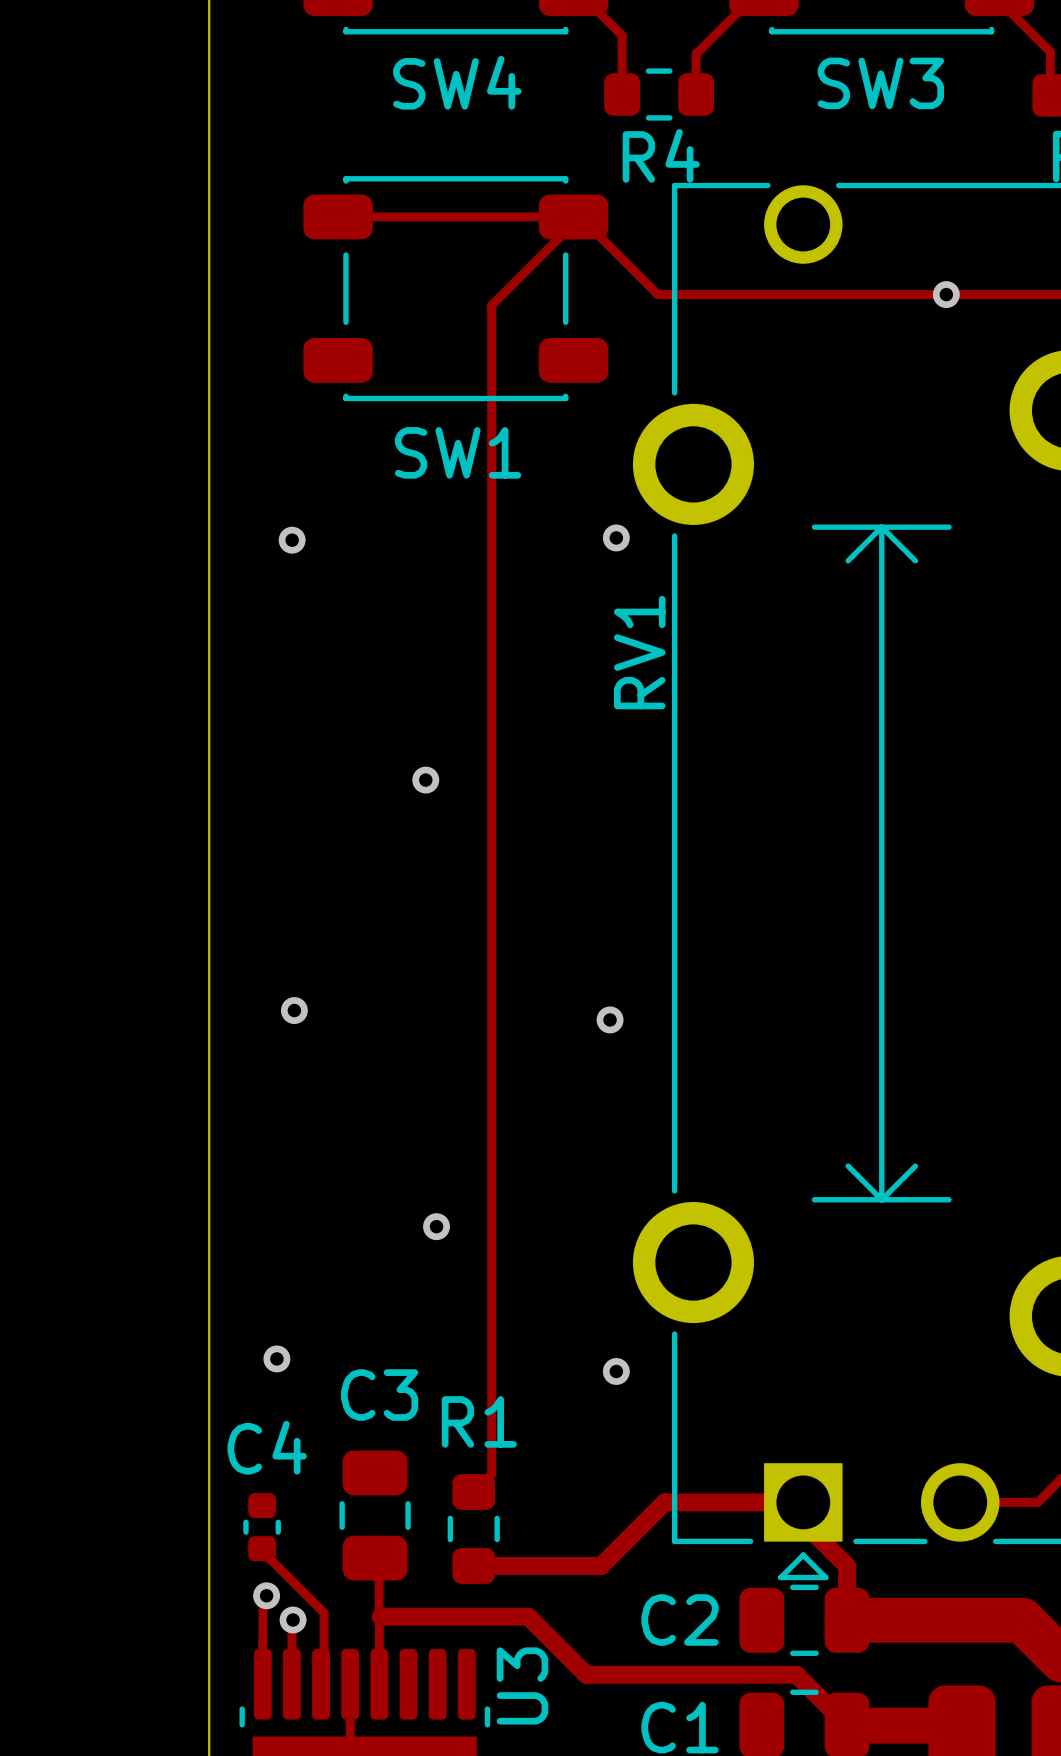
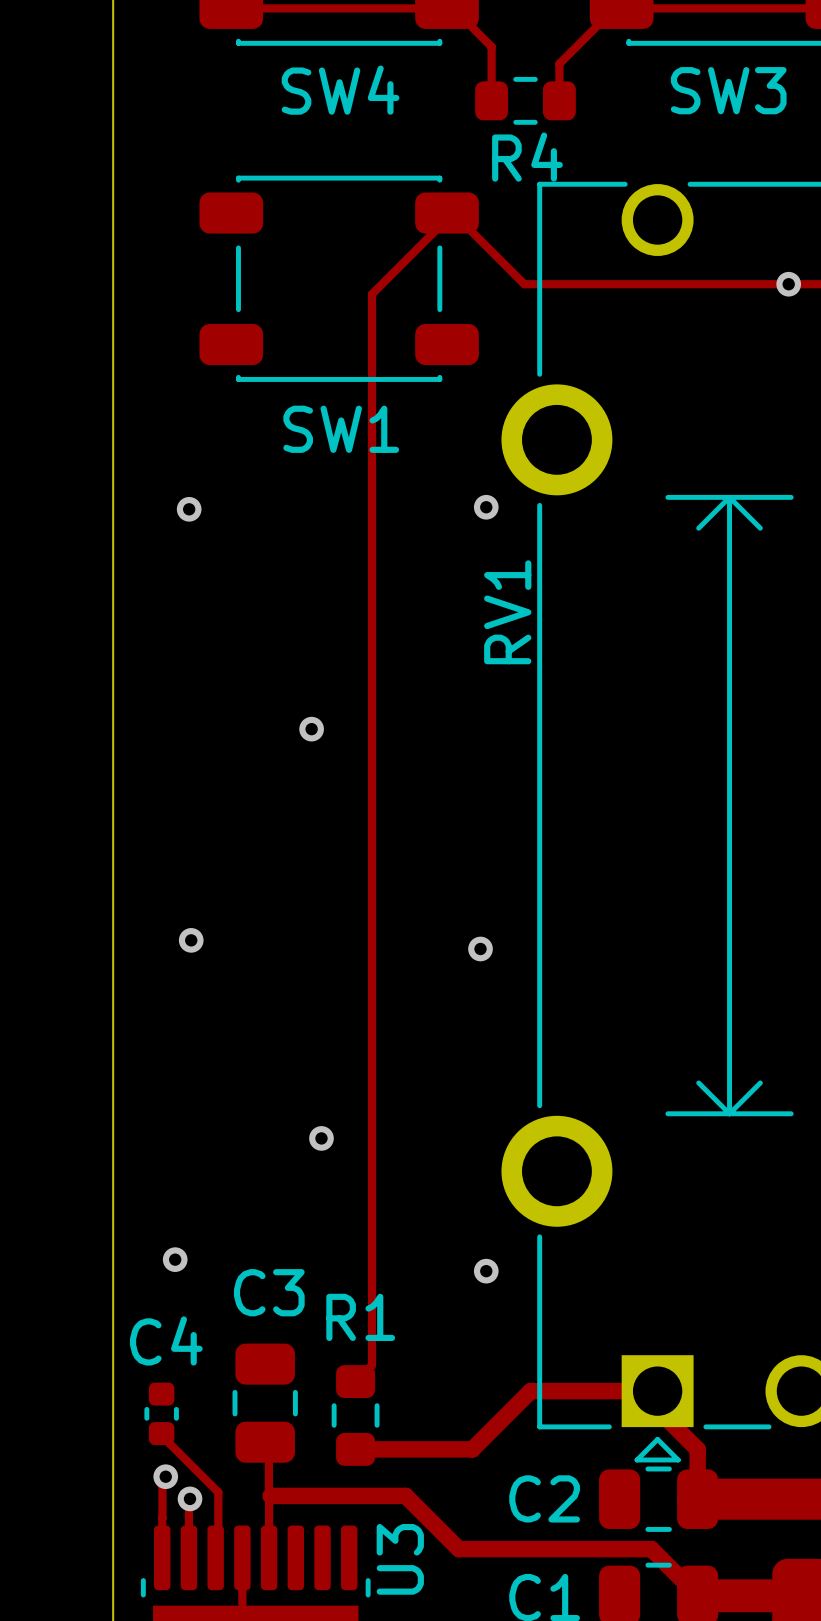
track: (338, 216) (573, 216) -> none

